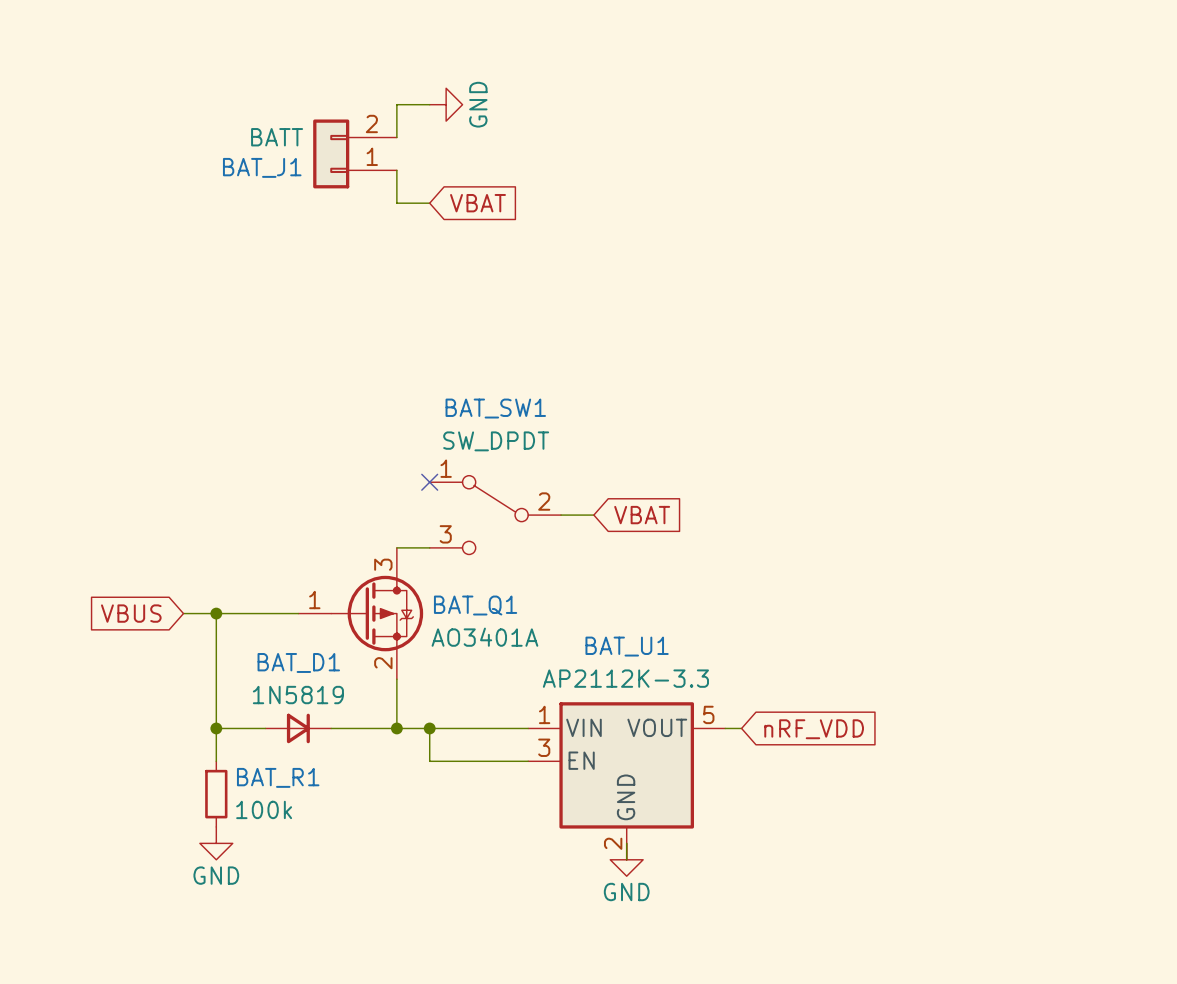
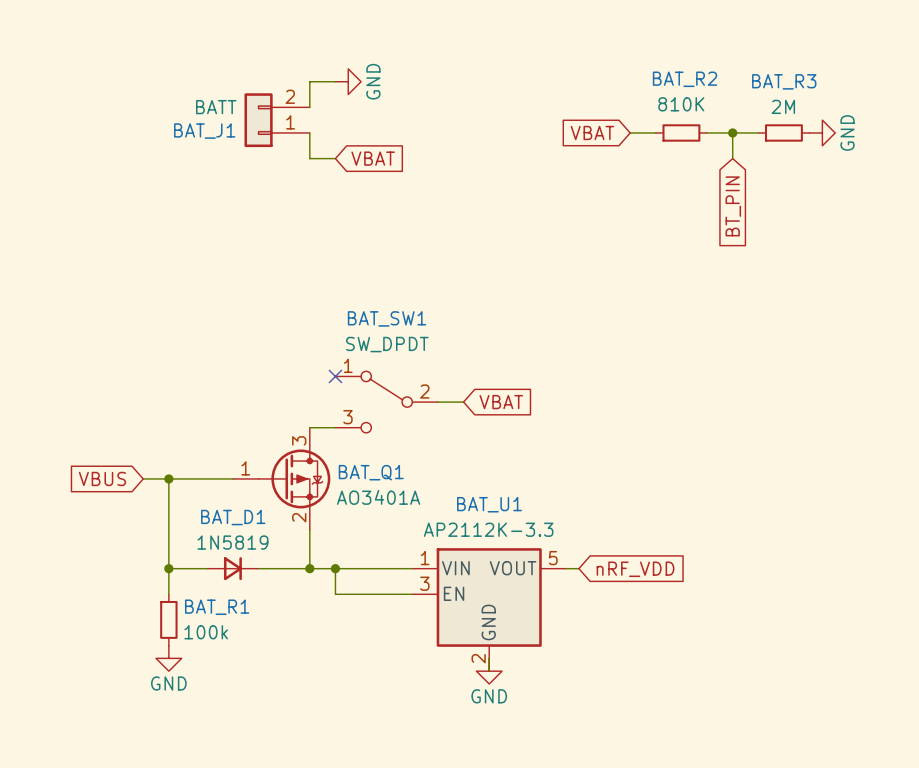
global label: none -> VBAT (592, 132)
wire: none -> (630, 132) (655, 132)
BAT_R2: none -> 810K (681, 132)
wire: none -> (707, 132) (758, 132)
wire: none -> (732, 132) (732, 158)
junction: none -> (732, 132)
BAT_R3: none -> 2M (783, 132)
power symbol: none -> GND (822, 132)
global label: none -> BT_PIN (733, 206)

